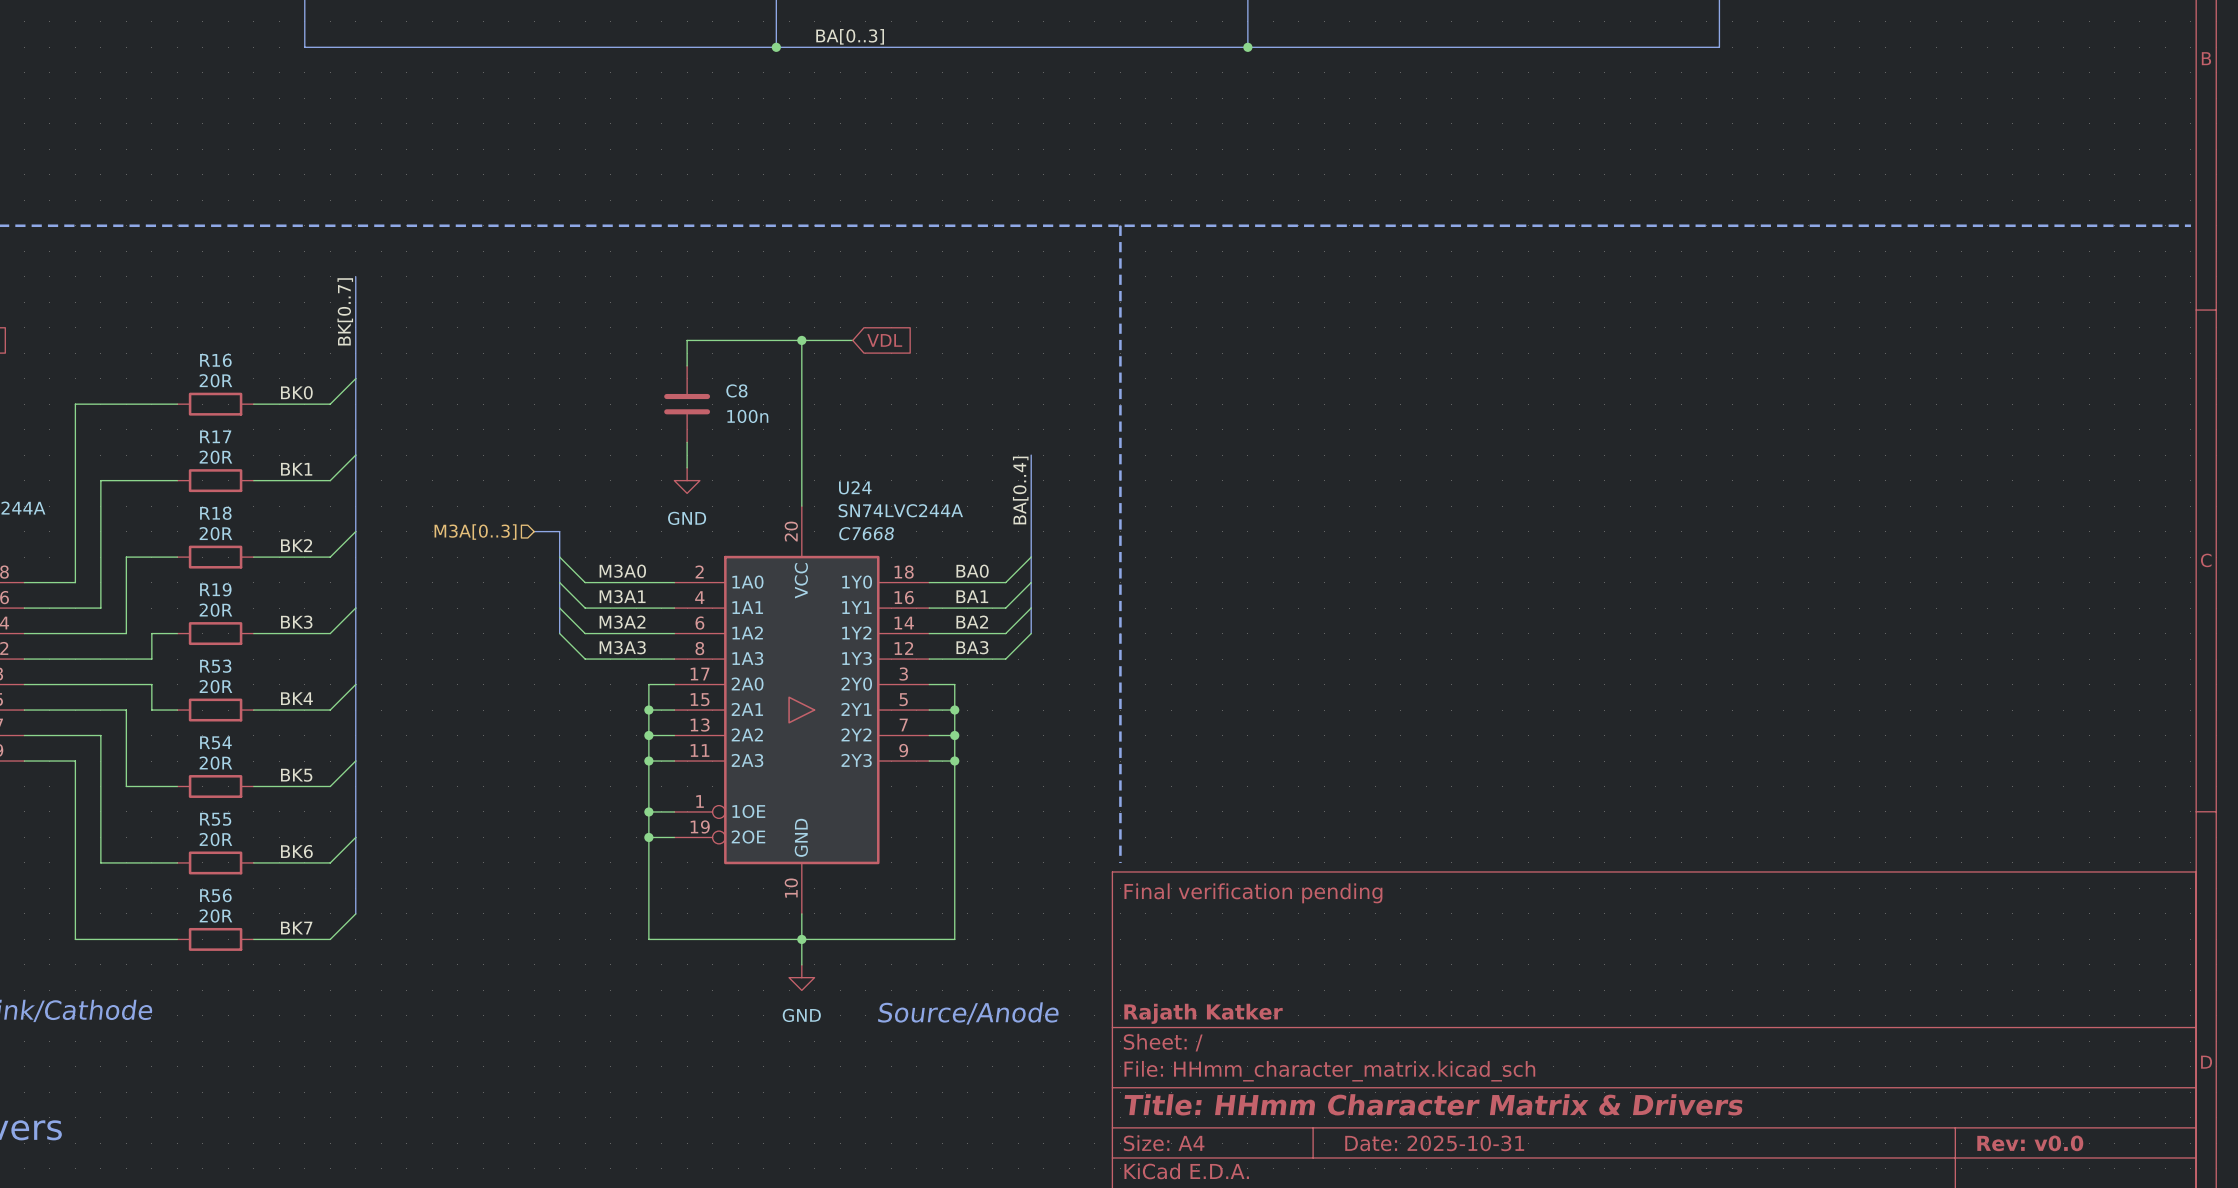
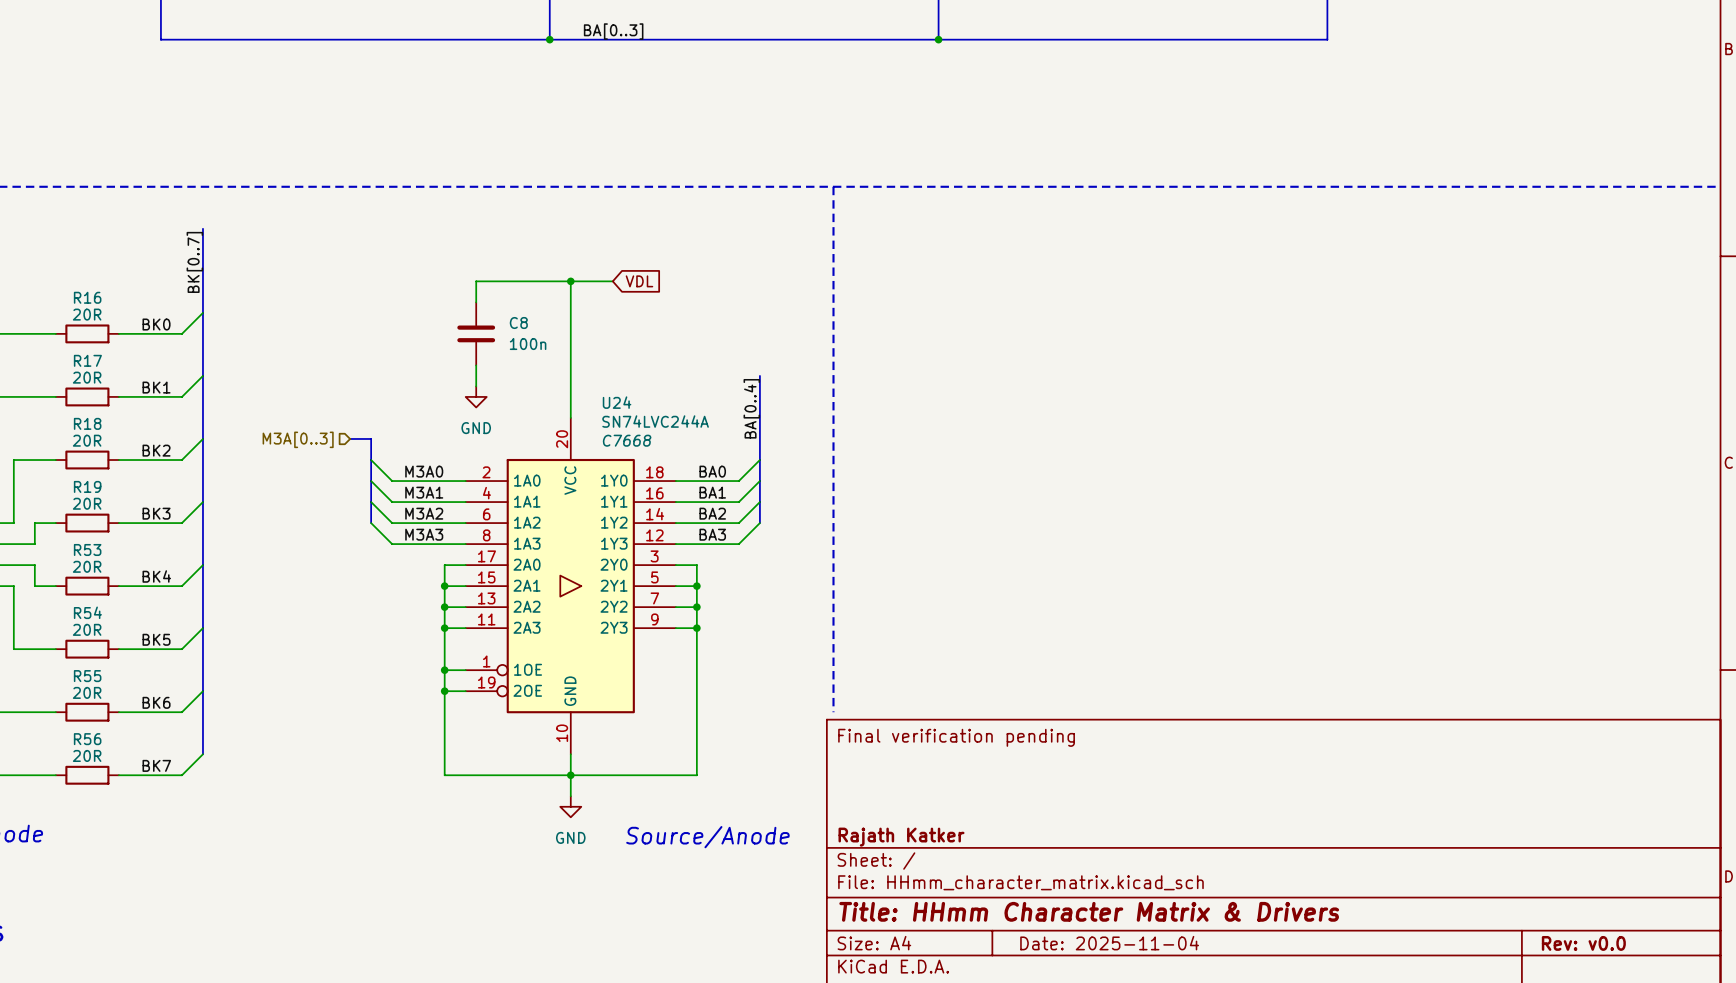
title block: Date: 2025-10-31 (1434, 1143) -> Date: 2025-11-04 (1109, 943)

